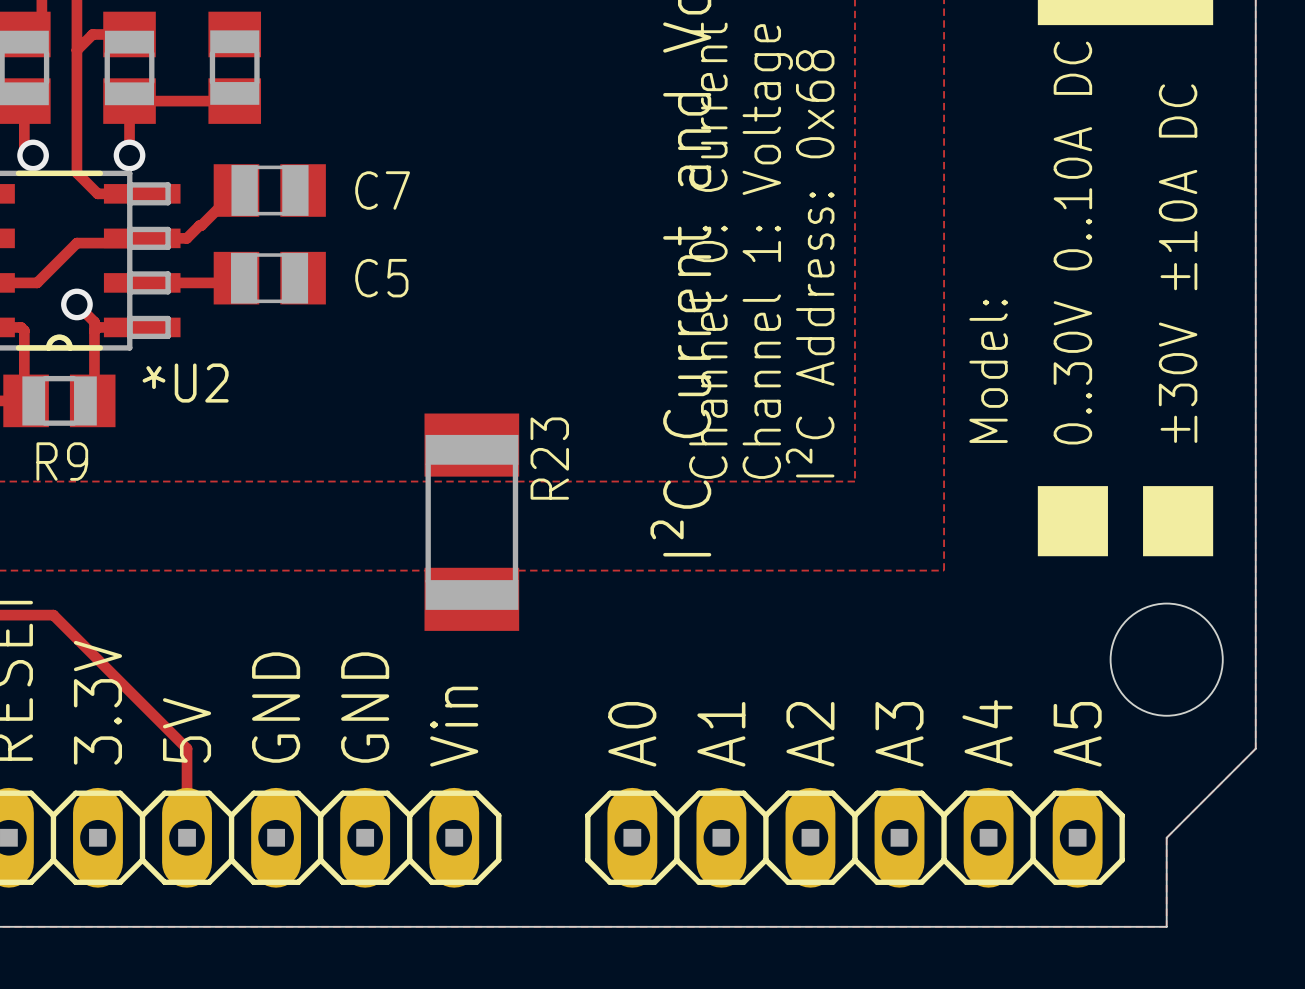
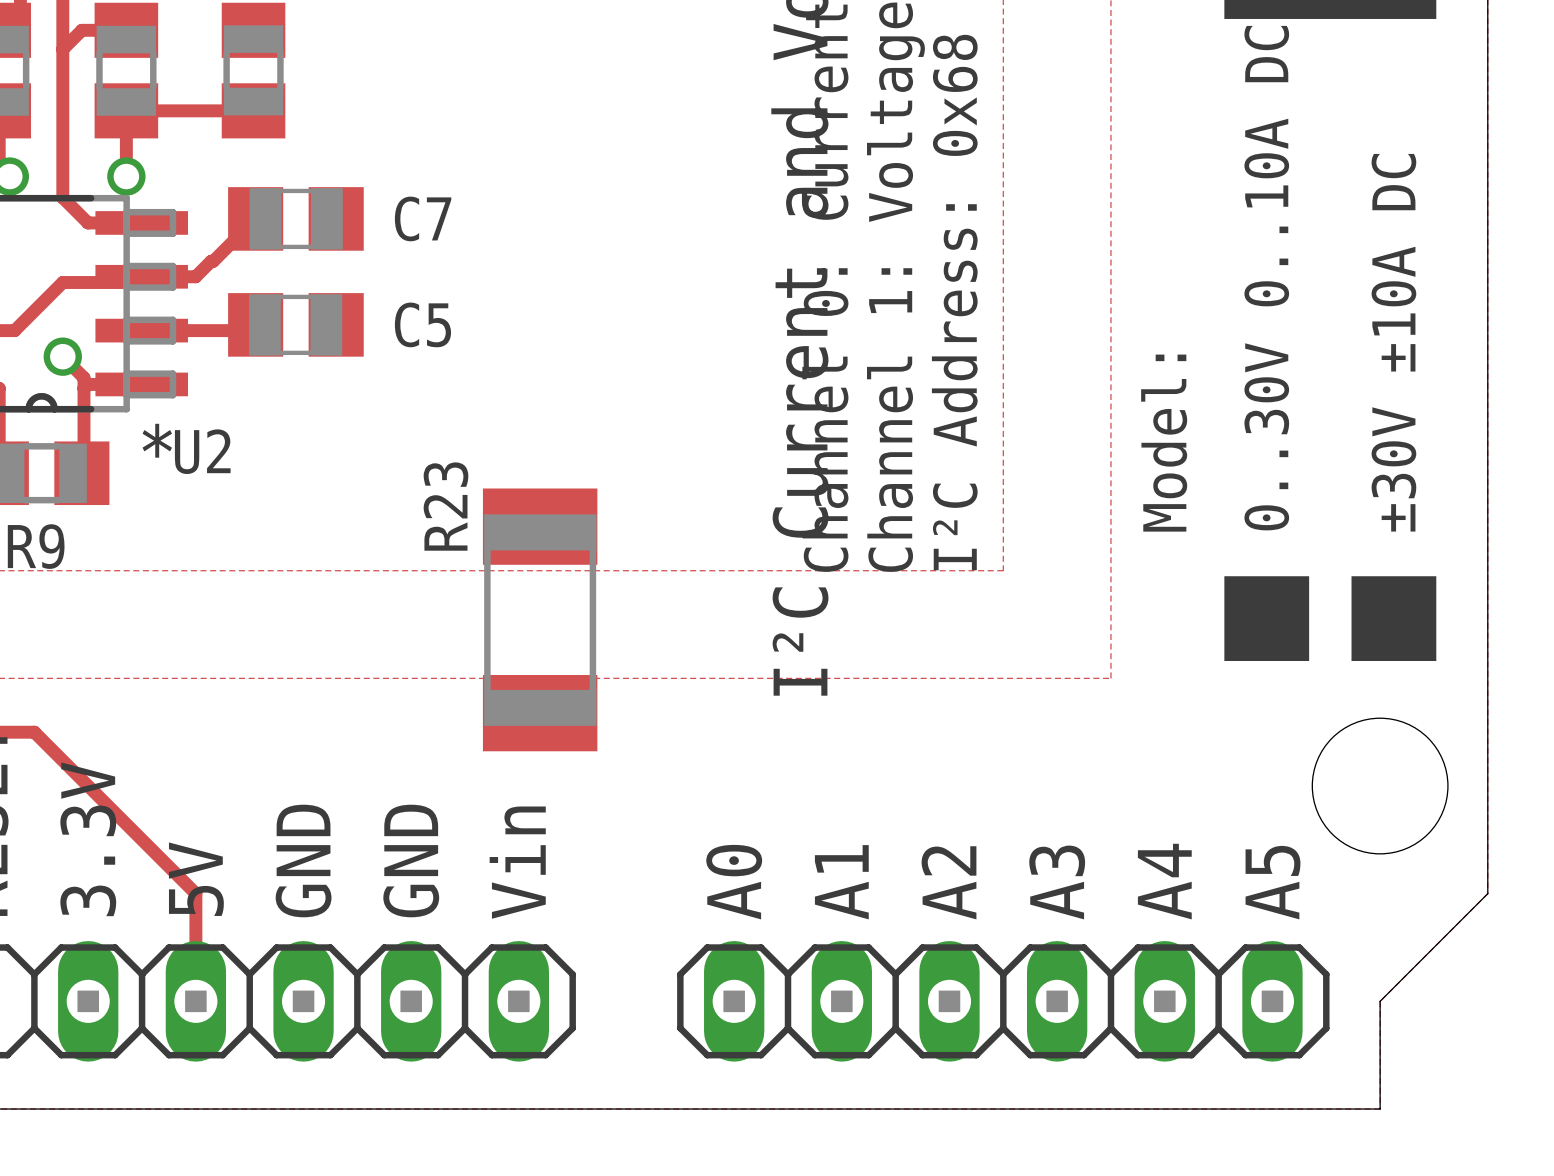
R23 name position: R23 (549, 458) -> R23 (445, 506)

